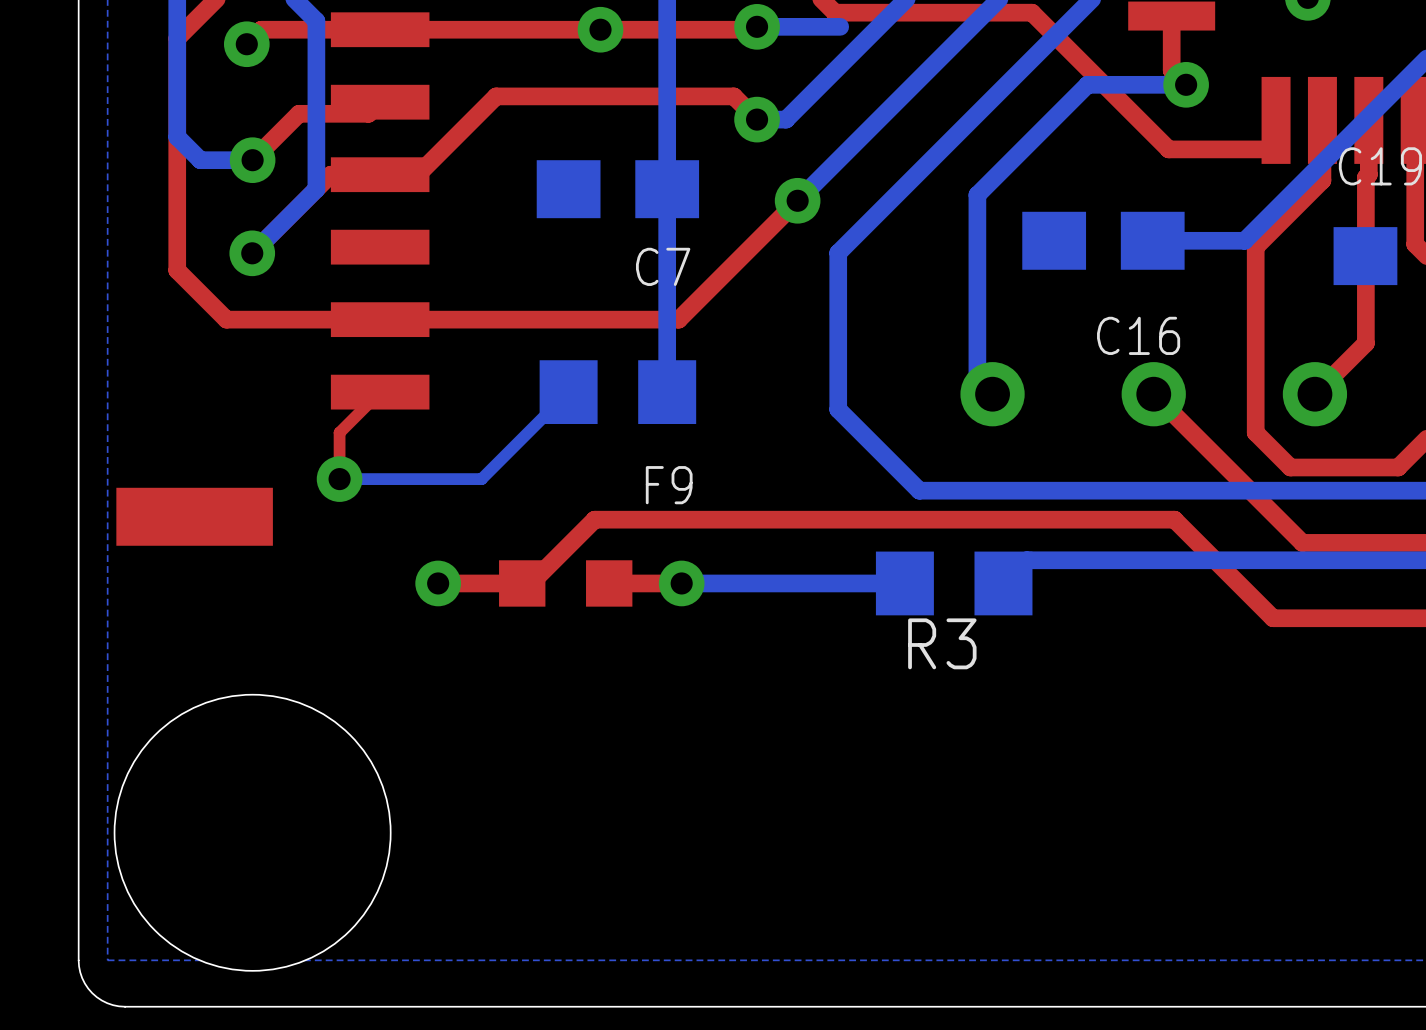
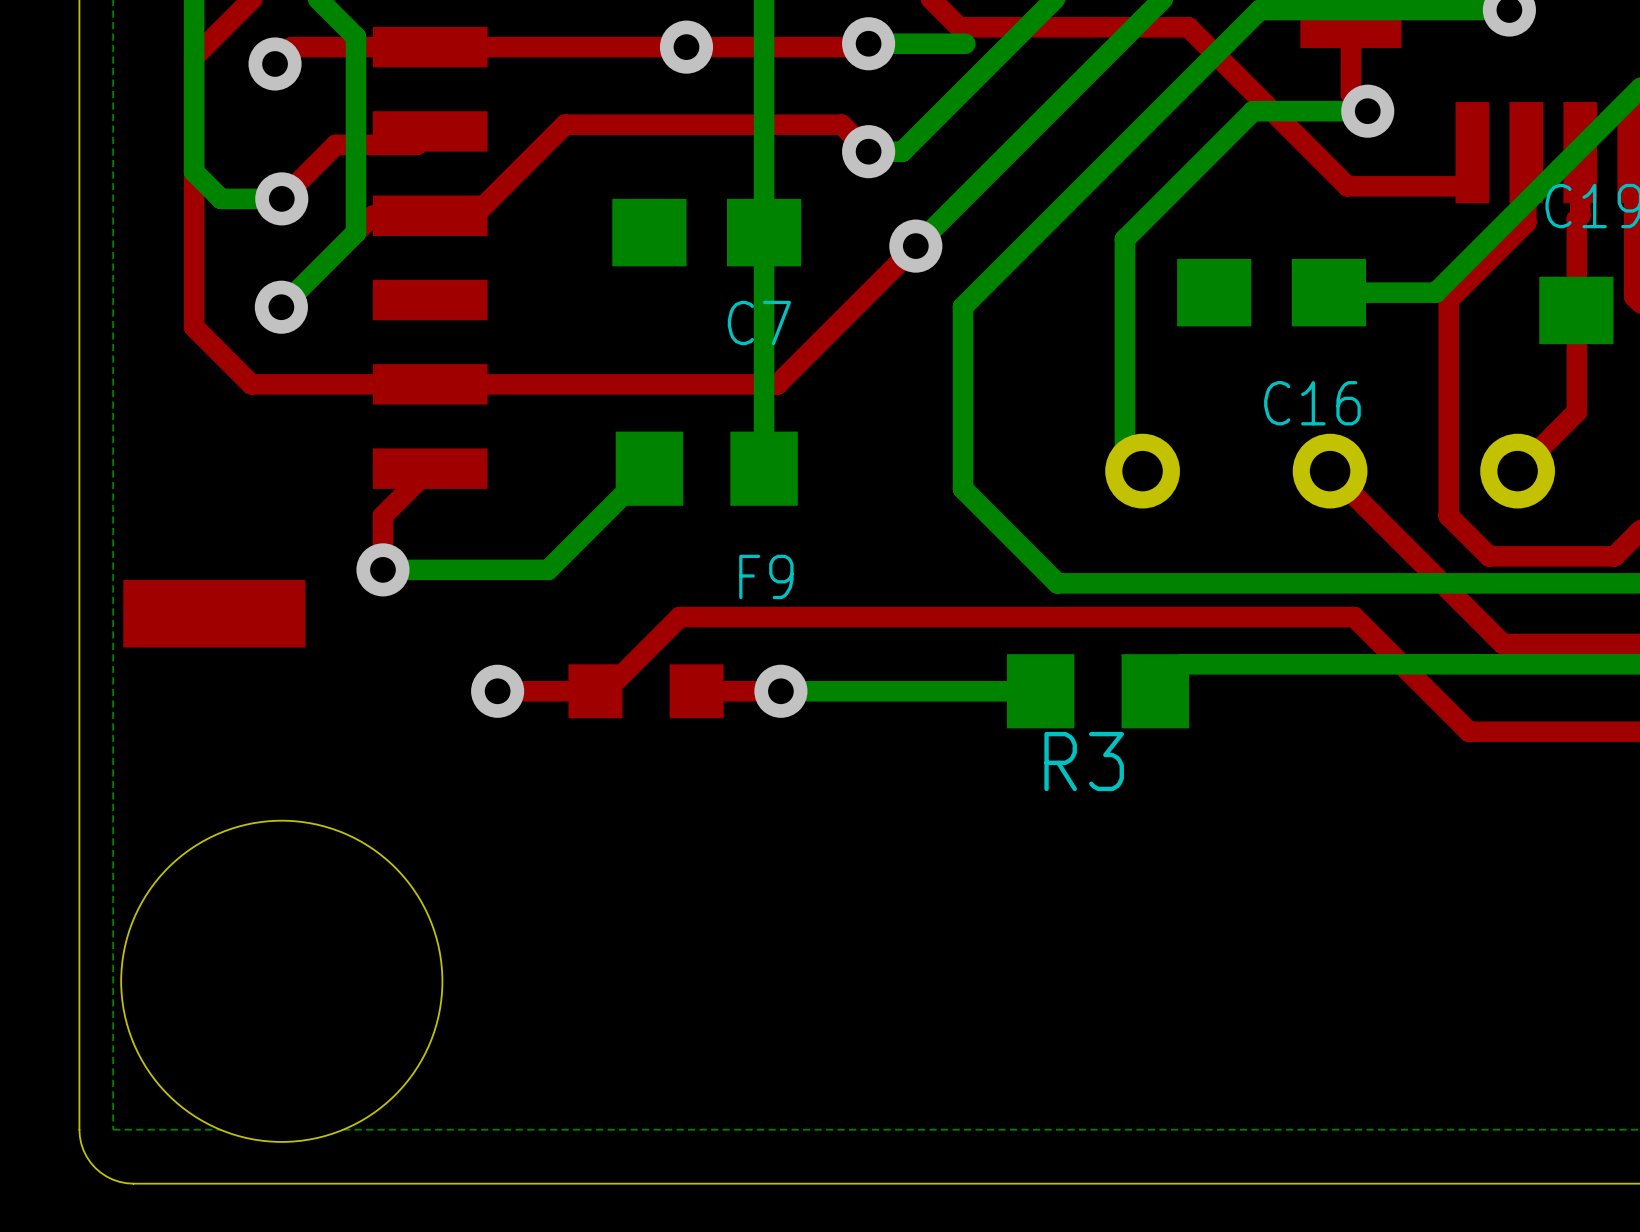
top track width: thin (380, 392) (339, 432) (339, 479) -> thick (430, 468) (382, 515) (382, 569)
bottom track width: thin (568, 392) (481, 479) (339, 479) -> thick (649, 468) (548, 569) (382, 569)

